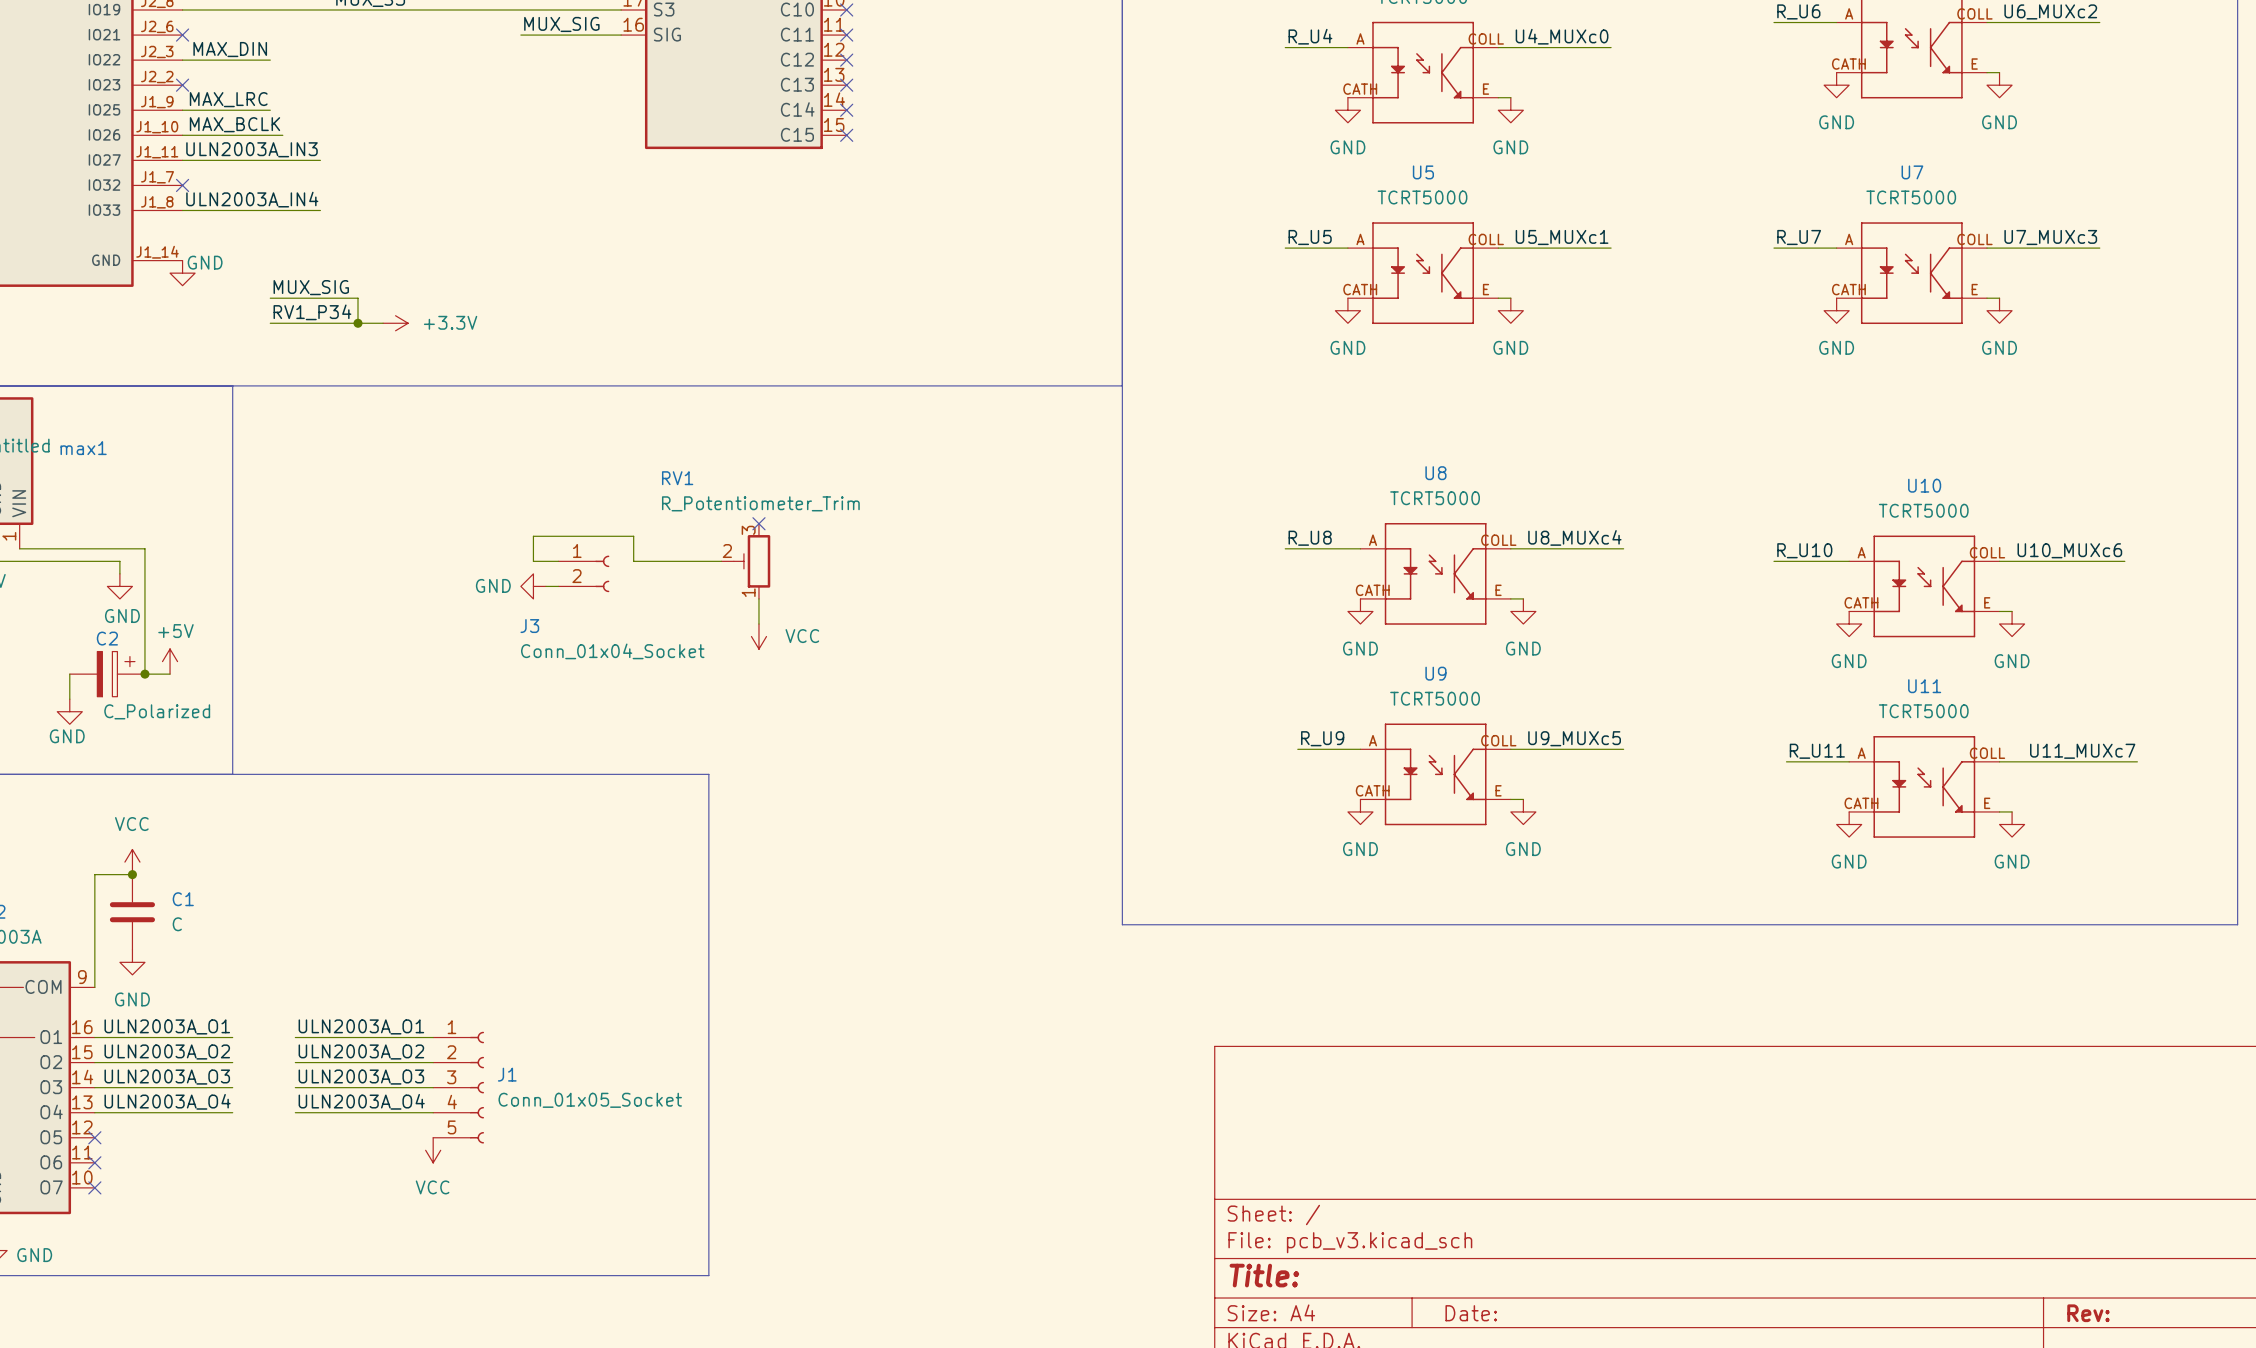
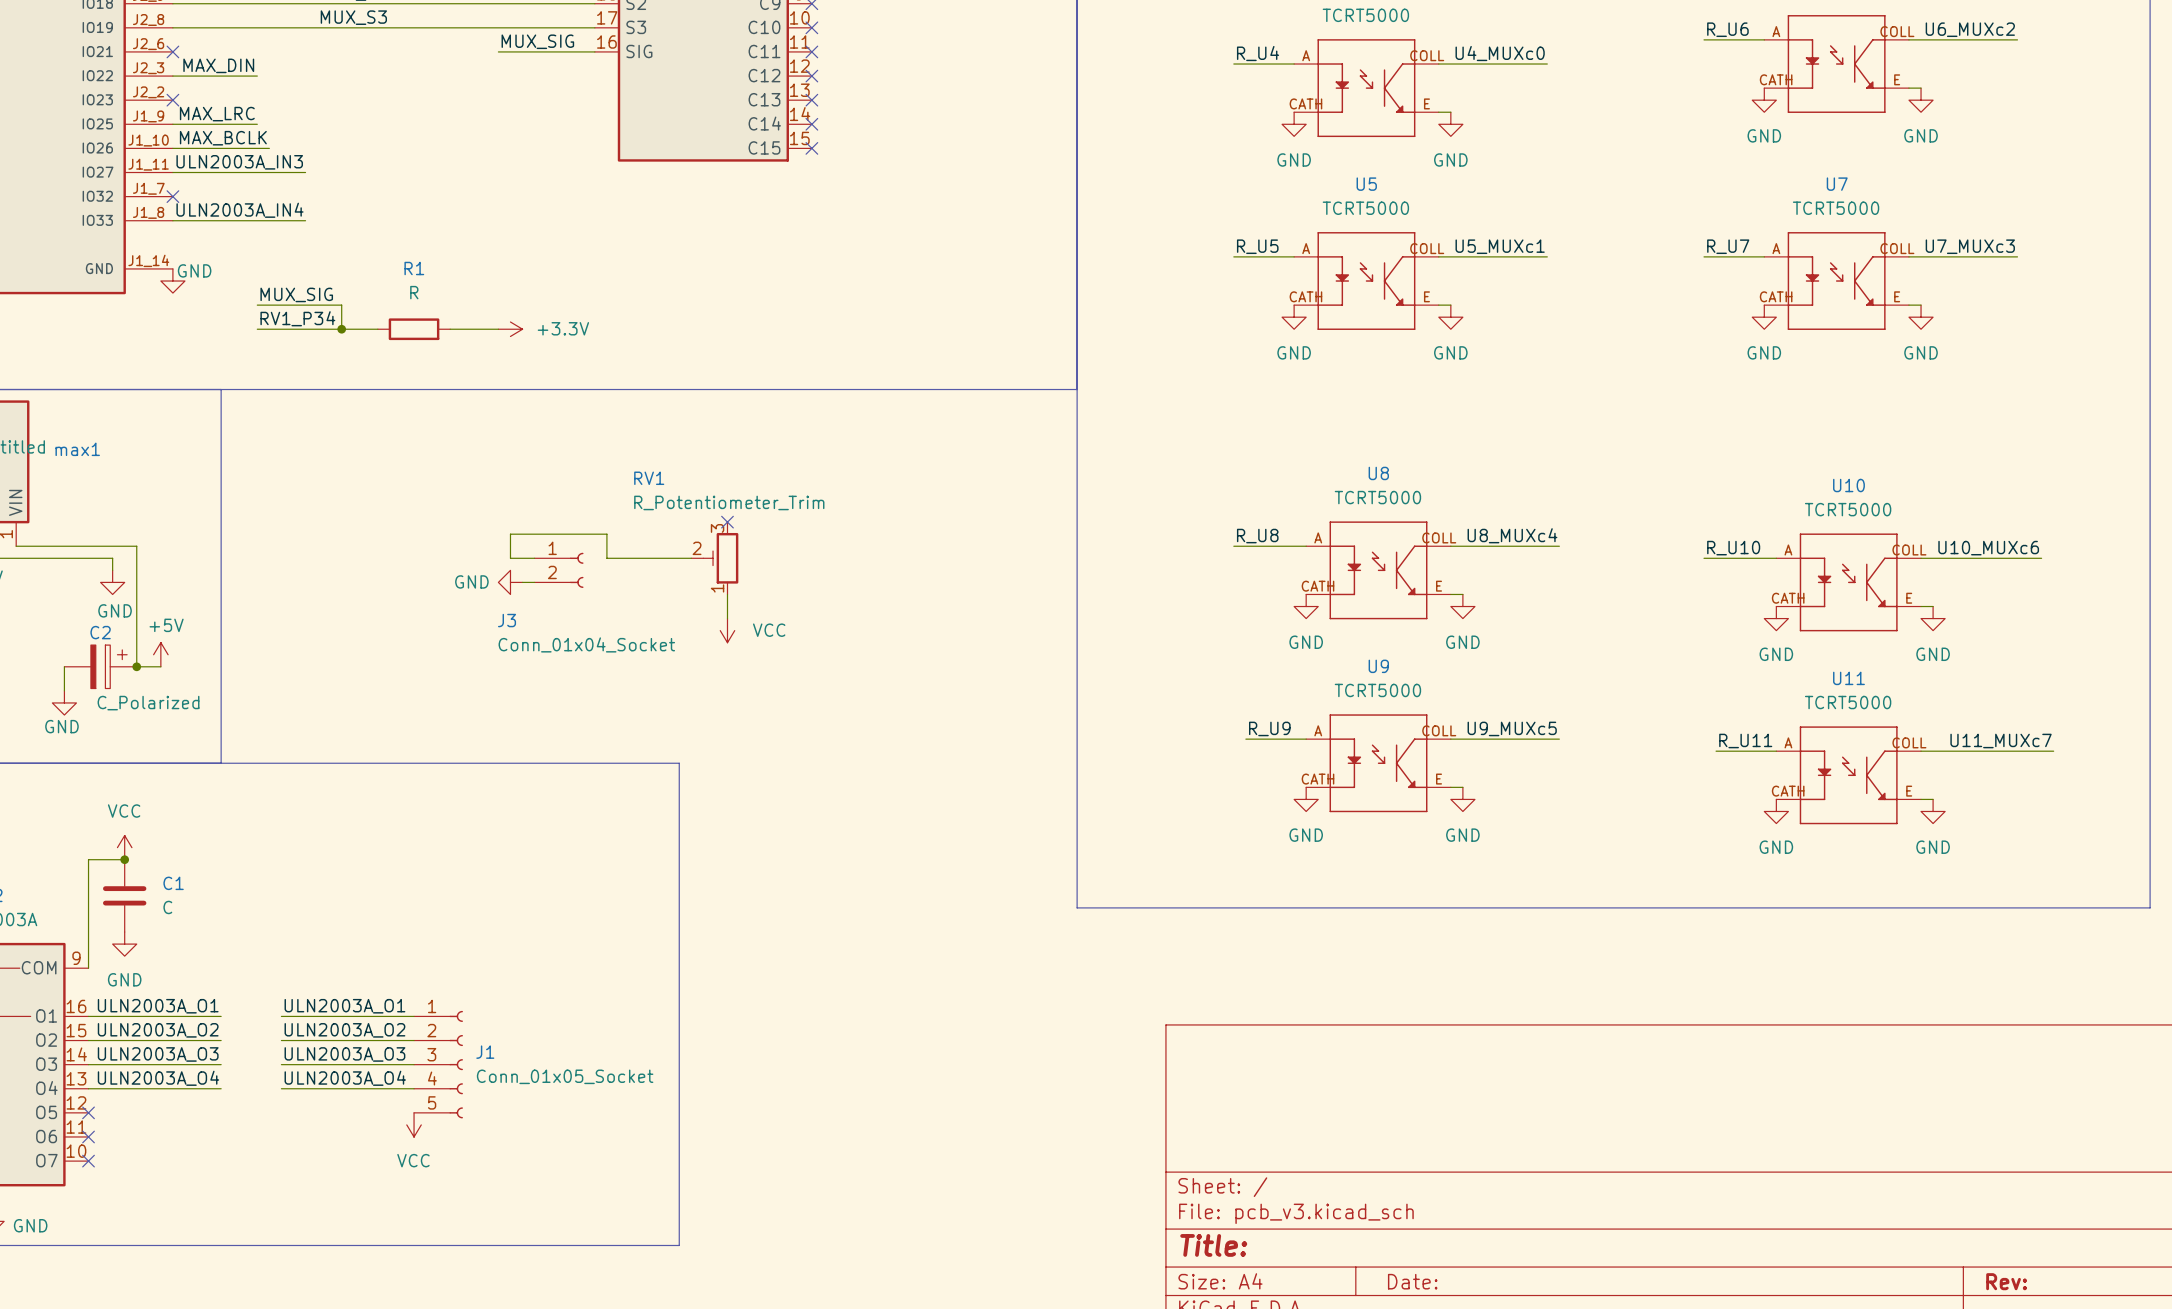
power symbol position: +3.3V (395, 323) -> +3.3V (510, 329)
R1: none -> R (414, 329)
wire: none -> (450, 329) (498, 329)

